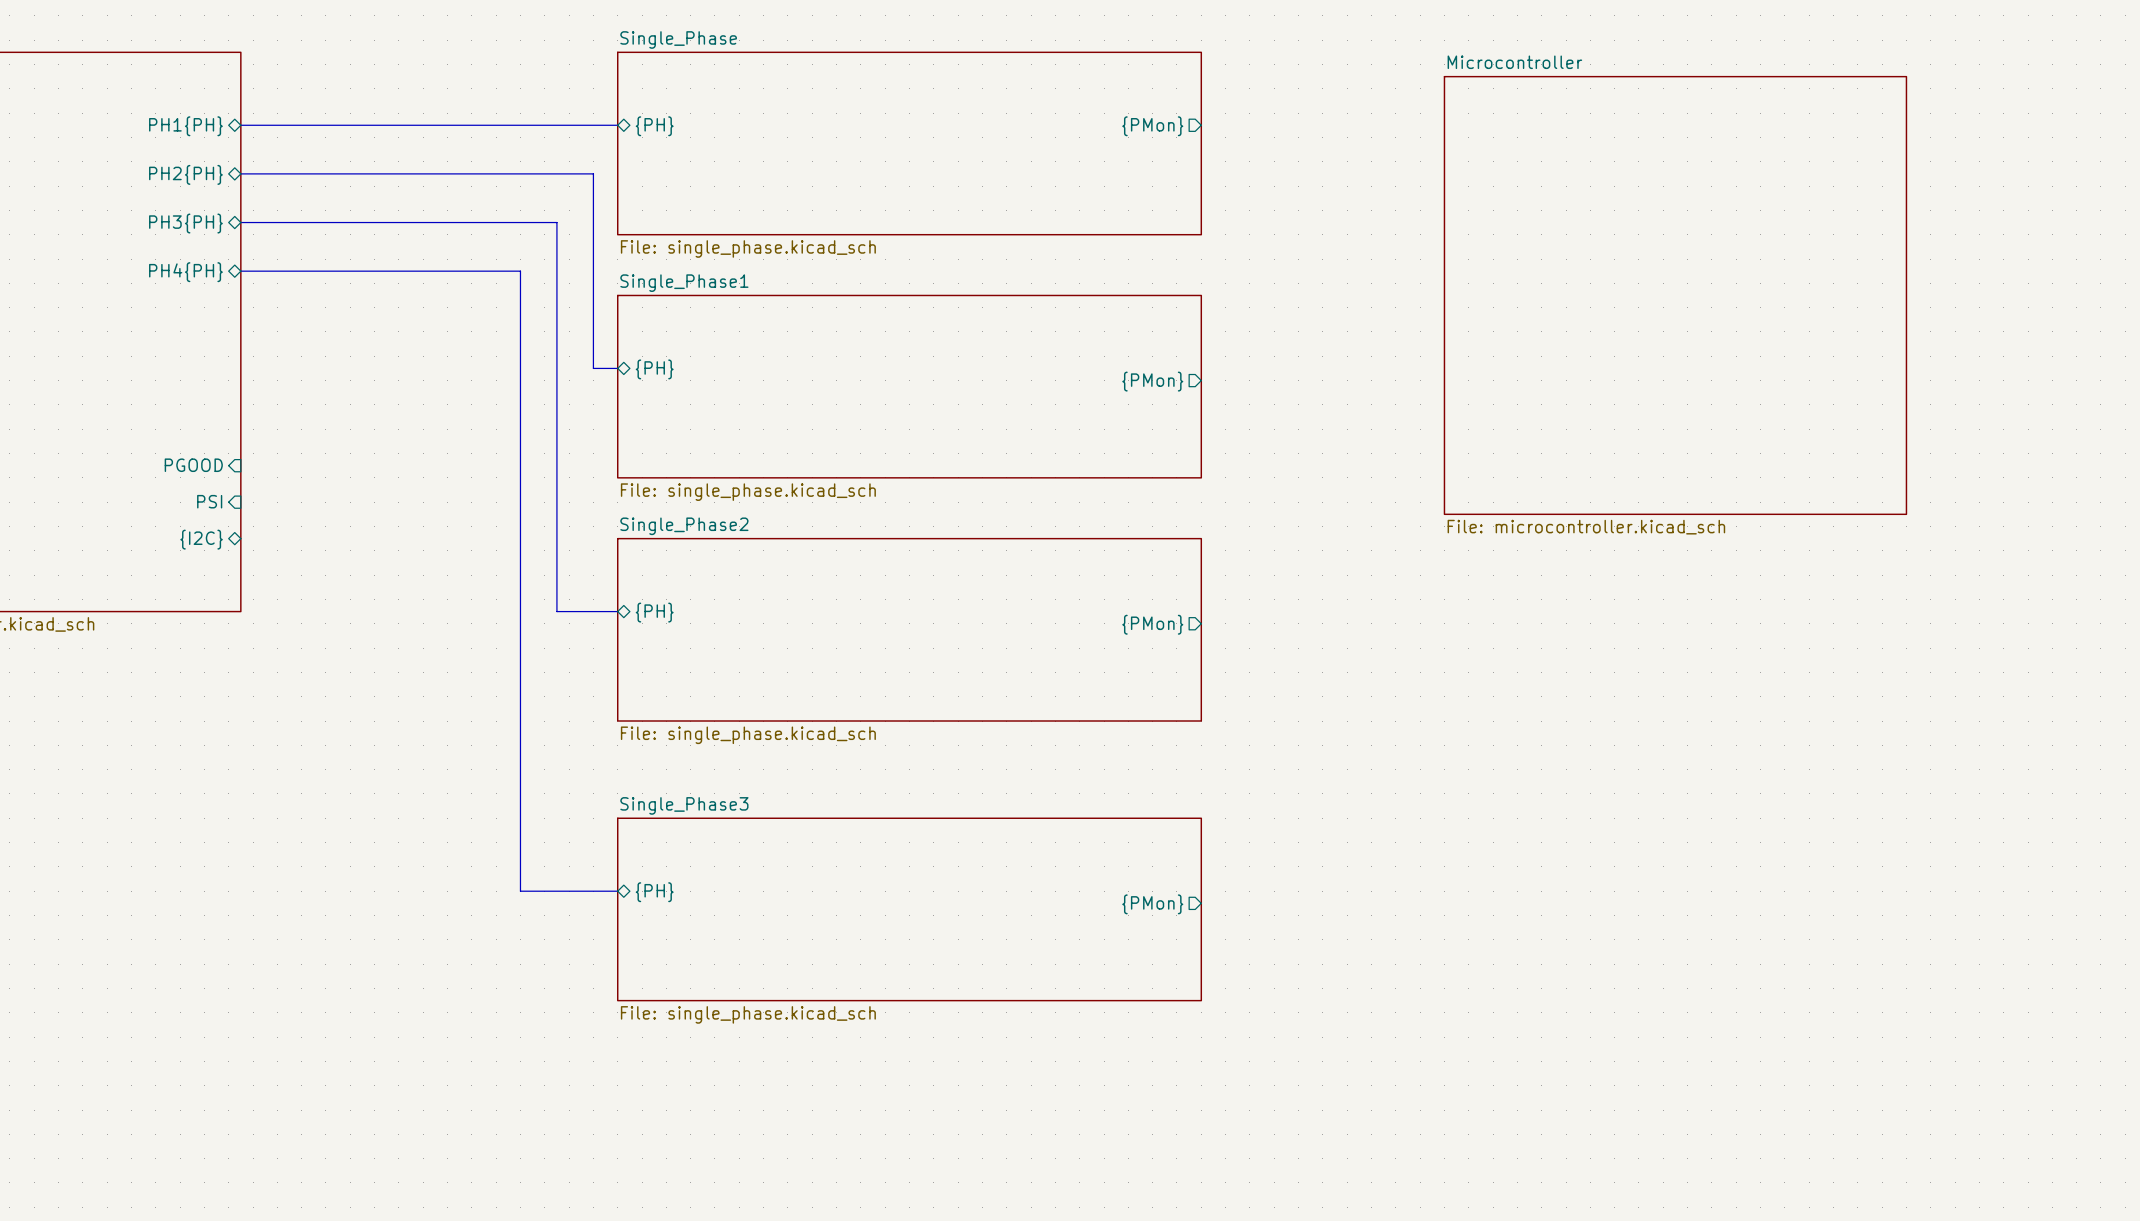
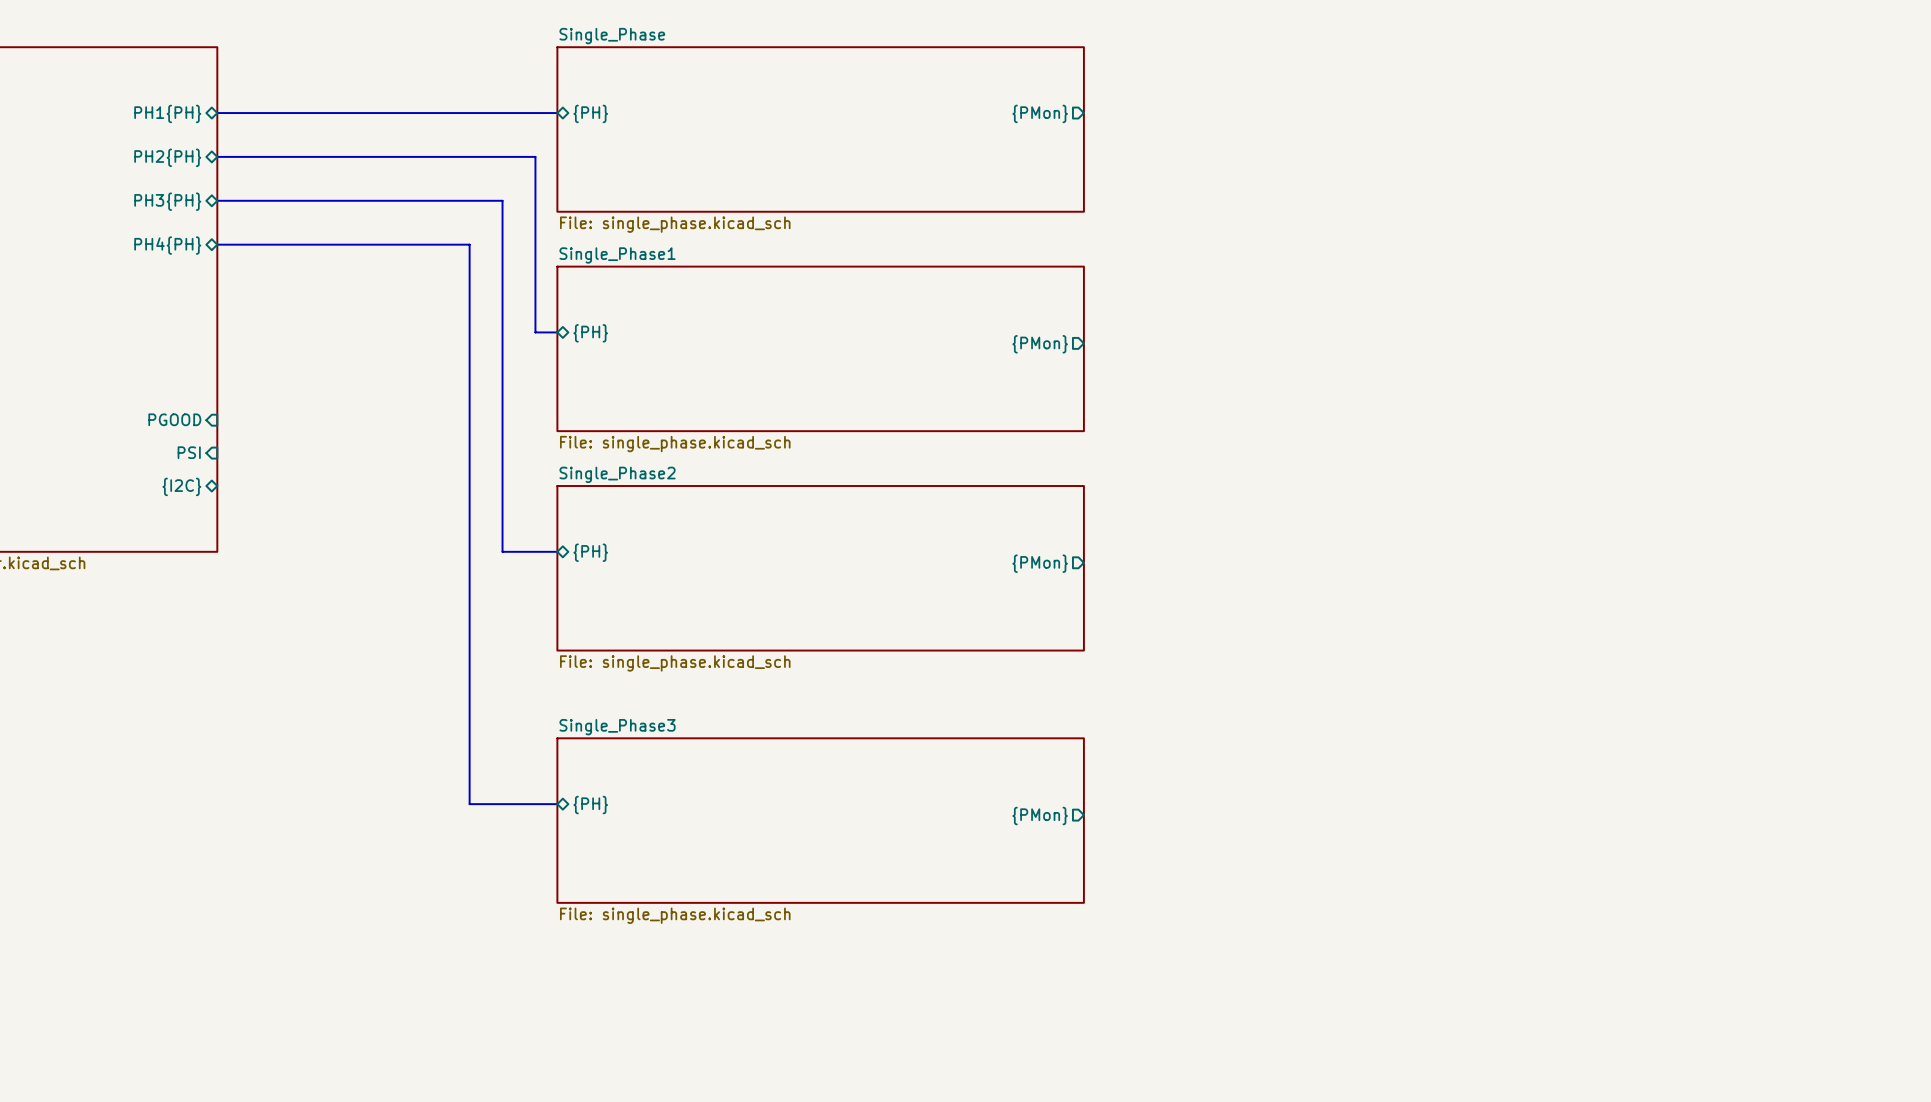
sheet Microcontroller: File: microcontroller.kicad_sch (1675, 295) -> none

